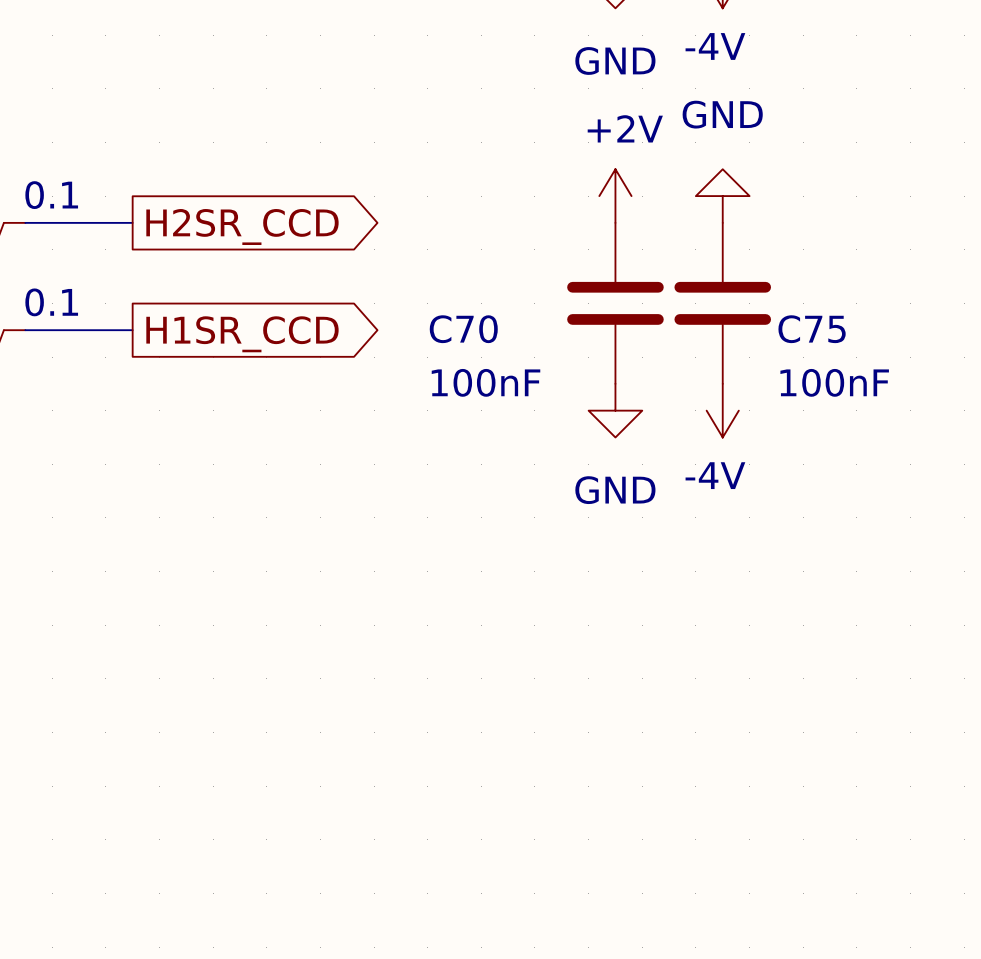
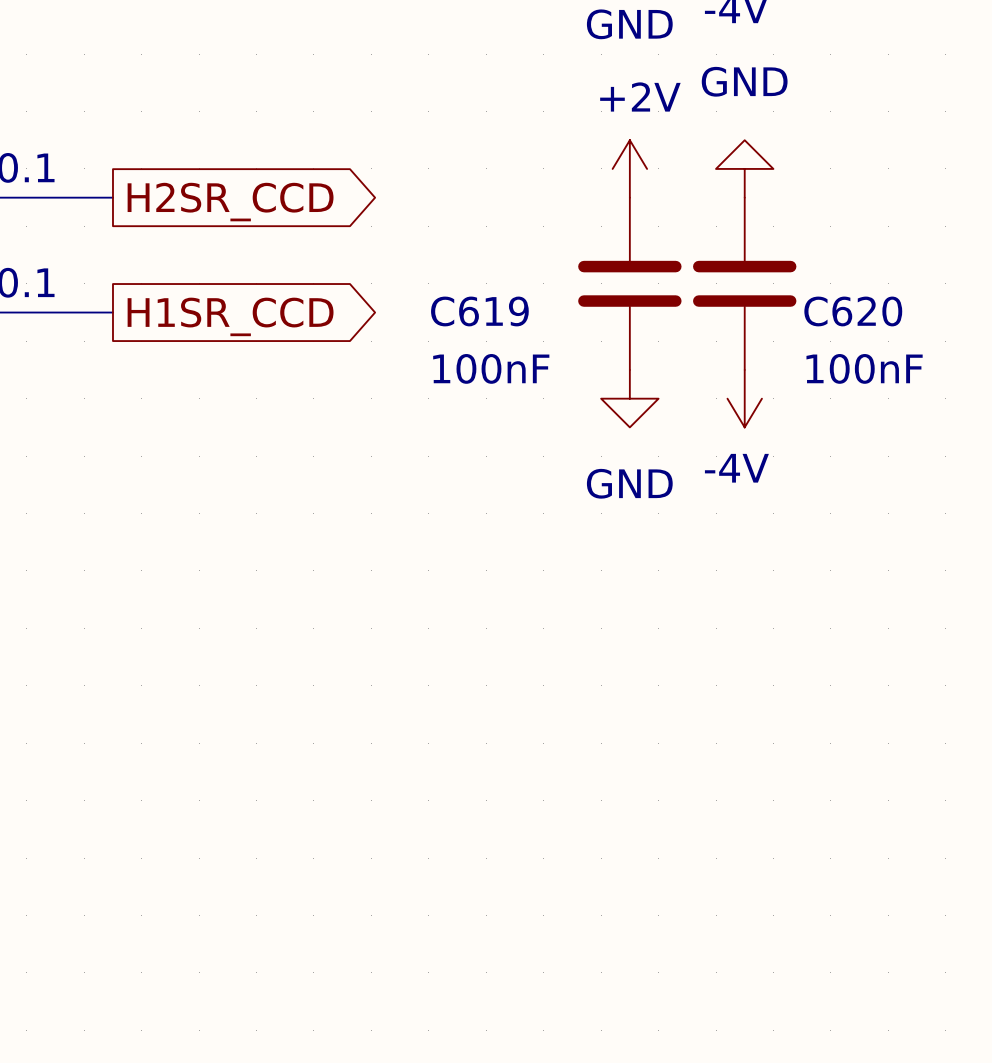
C70 name: C70 (463, 329) -> C619 (479, 311)
C75 name: C75 (812, 329) -> C620 (853, 311)

